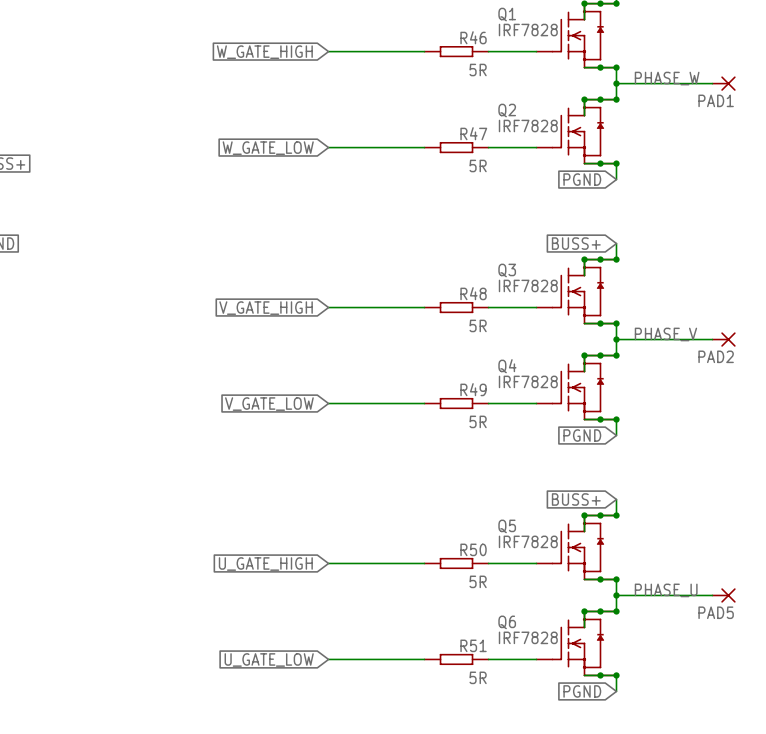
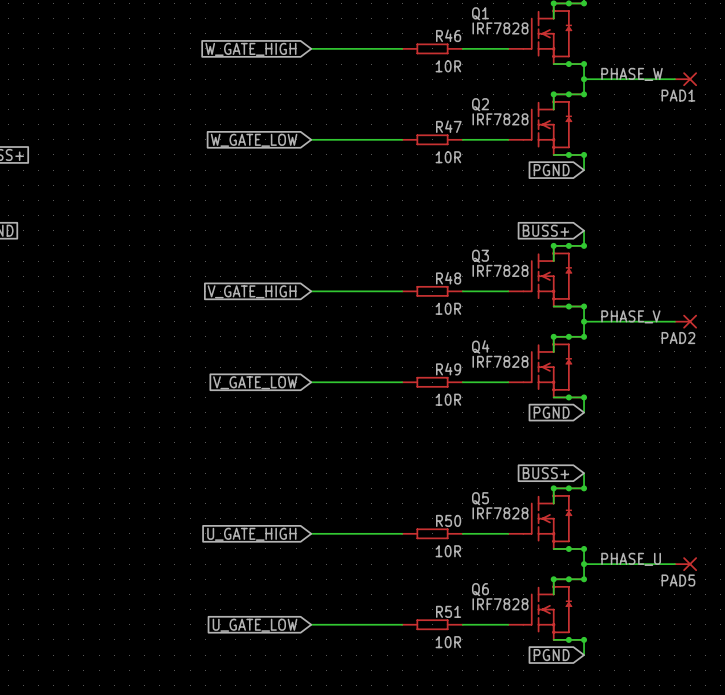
R46 value: 5R (478, 70) -> 10R (448, 66)
R47 value: 5R (478, 165) -> 10R (448, 157)
R48 value: 5R (478, 325) -> 10R (448, 308)
R49 value: 5R (478, 421) -> 10R (448, 399)
R50 value: 5R (478, 581) -> 10R (448, 551)
R51 value: 5R (478, 677) -> 10R (448, 642)

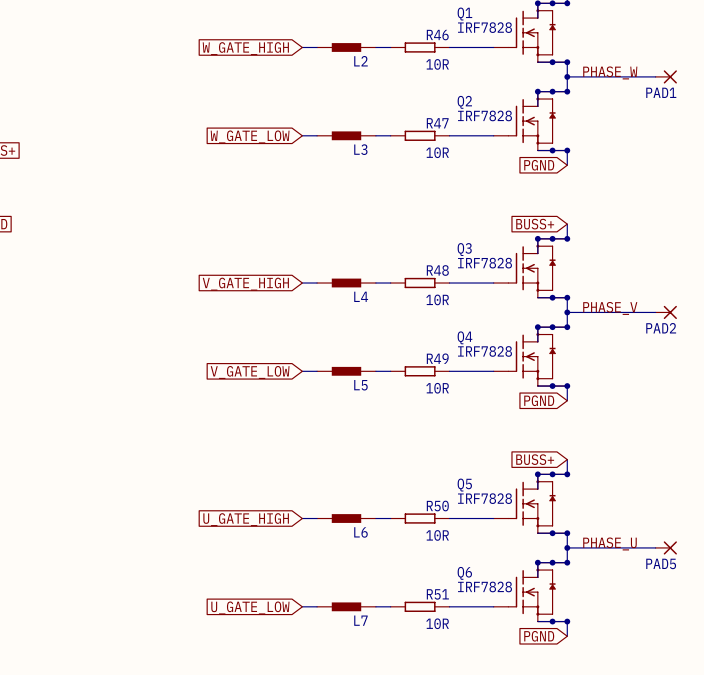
L2: none -> (346, 47)
L3: none -> (346, 135)
L4: none -> (346, 283)
L5: none -> (346, 371)
L6: none -> (346, 518)
L7: none -> (346, 606)

